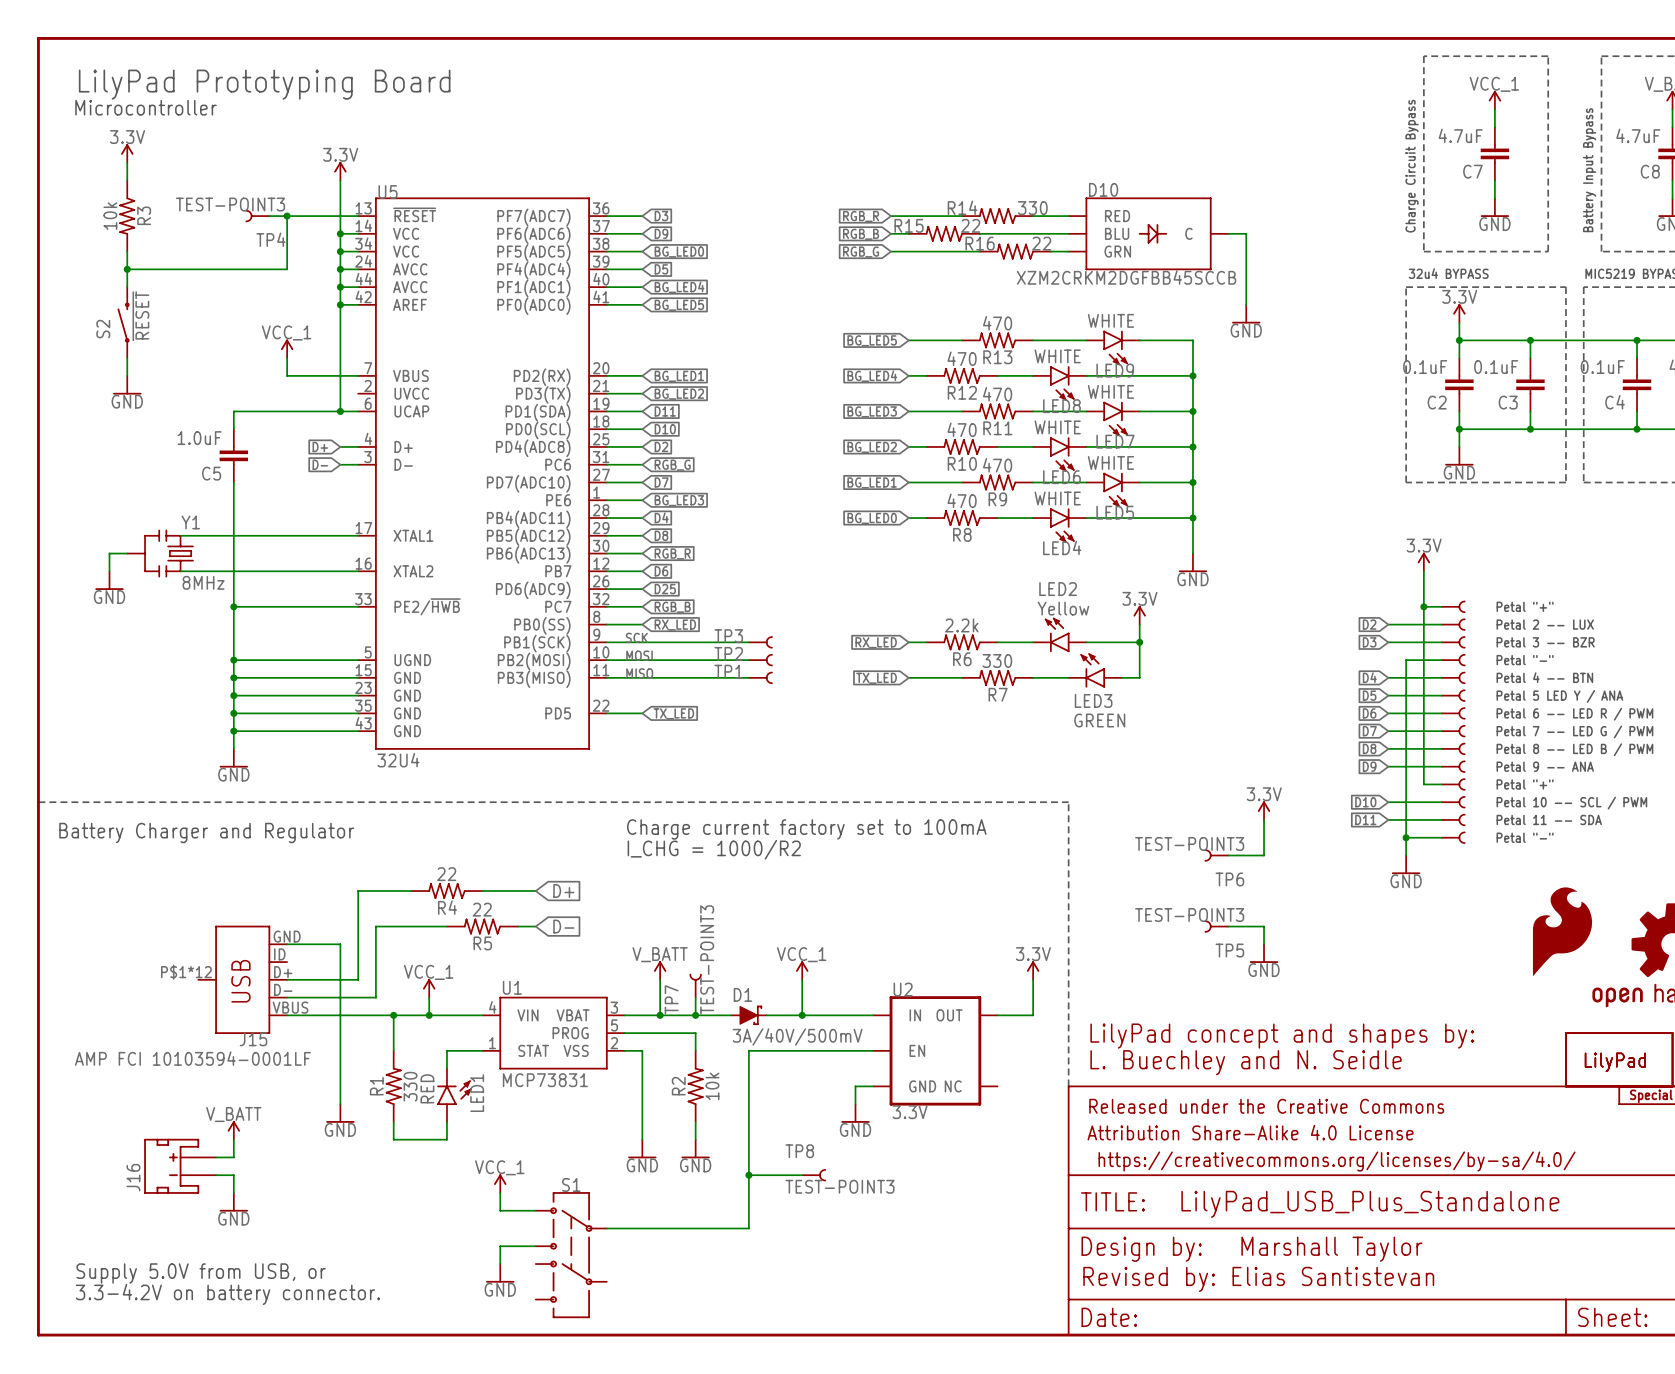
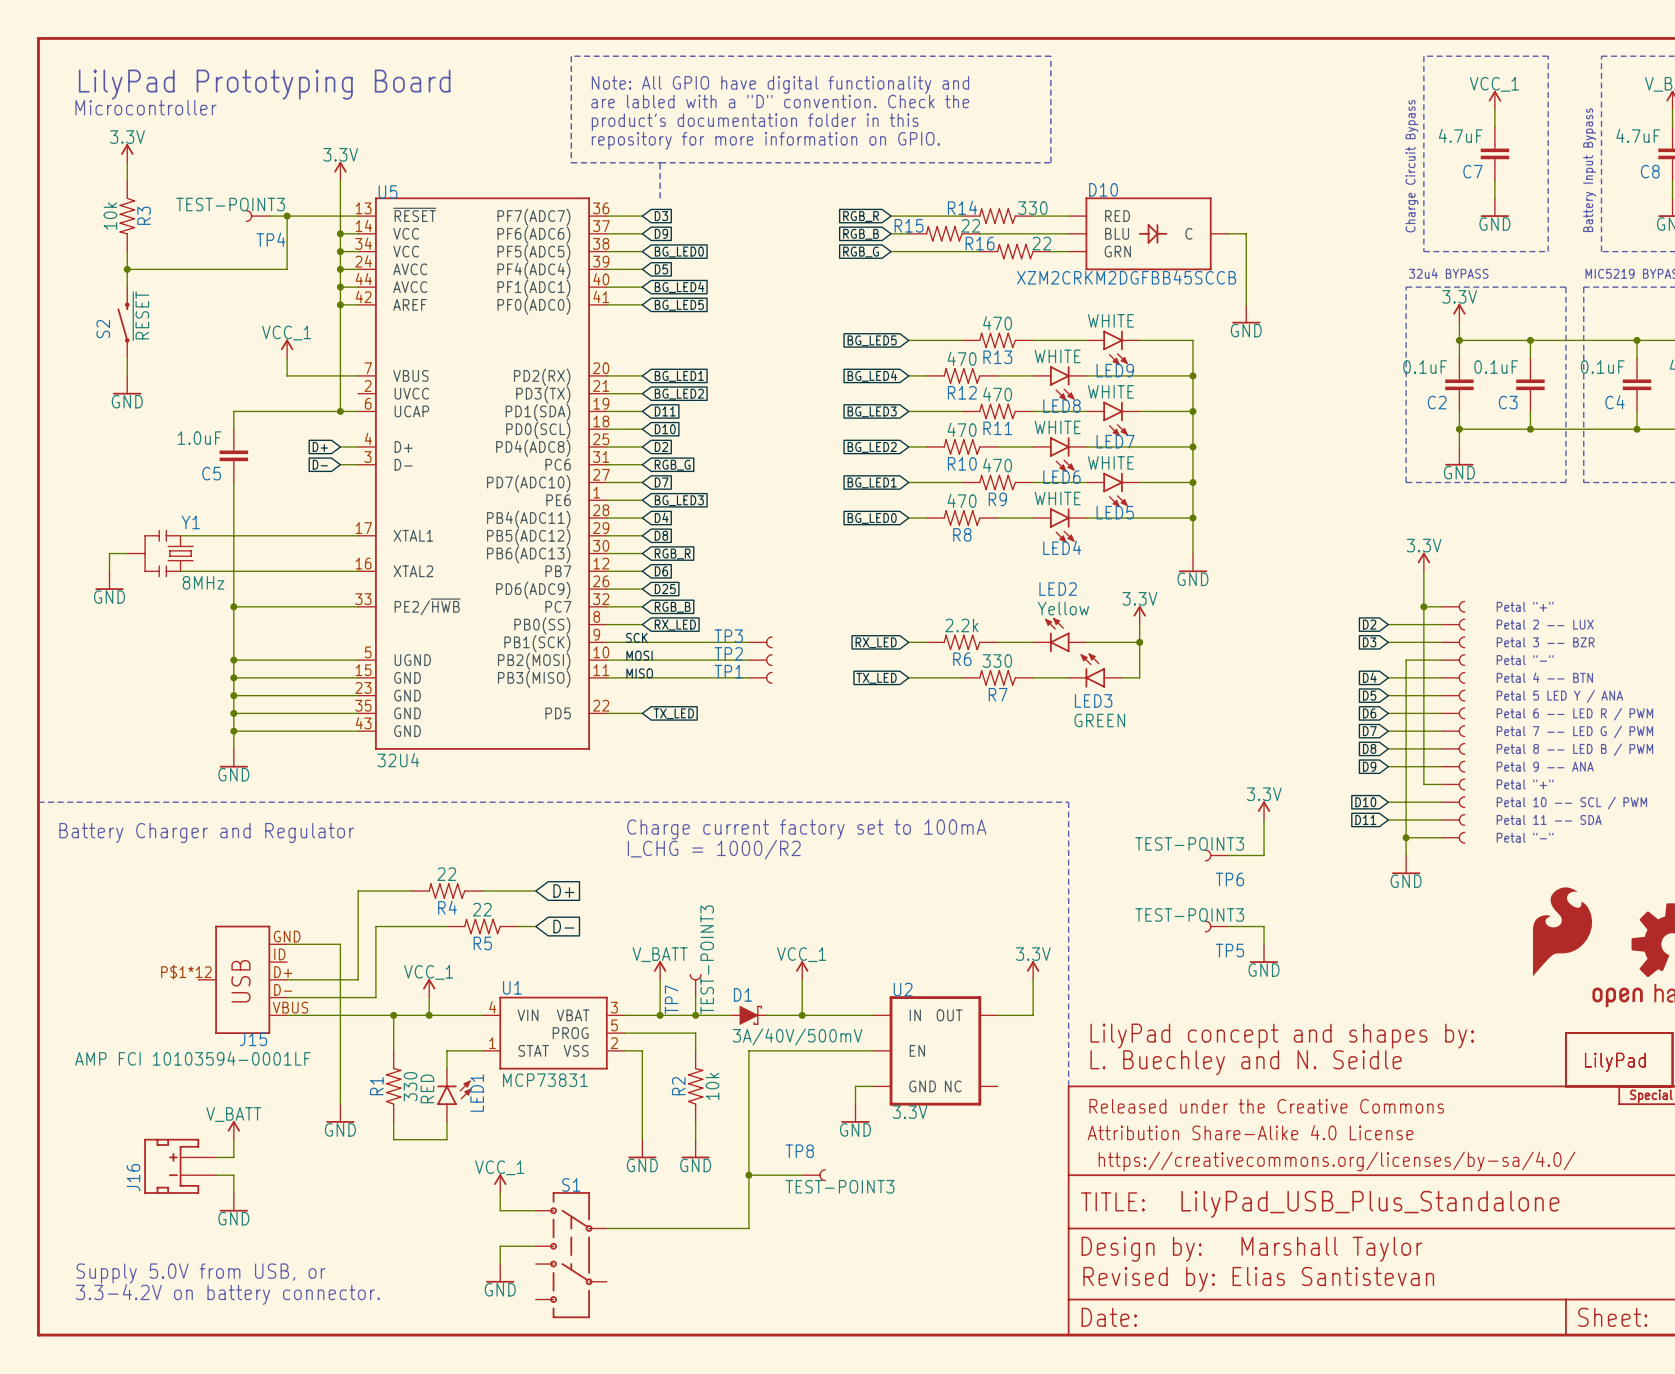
line: none -> (571, 56) (571, 162) (1050, 162) (1050, 56) (571, 56)
text: none -> Note: All GPIO have digital functionality and (780, 84)
text: none -> are labled with a "D" convention. Check the (780, 101)
text: none -> product's documentation folder in this (755, 122)
text: none -> repository for more information on GPIO. (765, 140)
line: none -> (660, 162) (660, 198)

